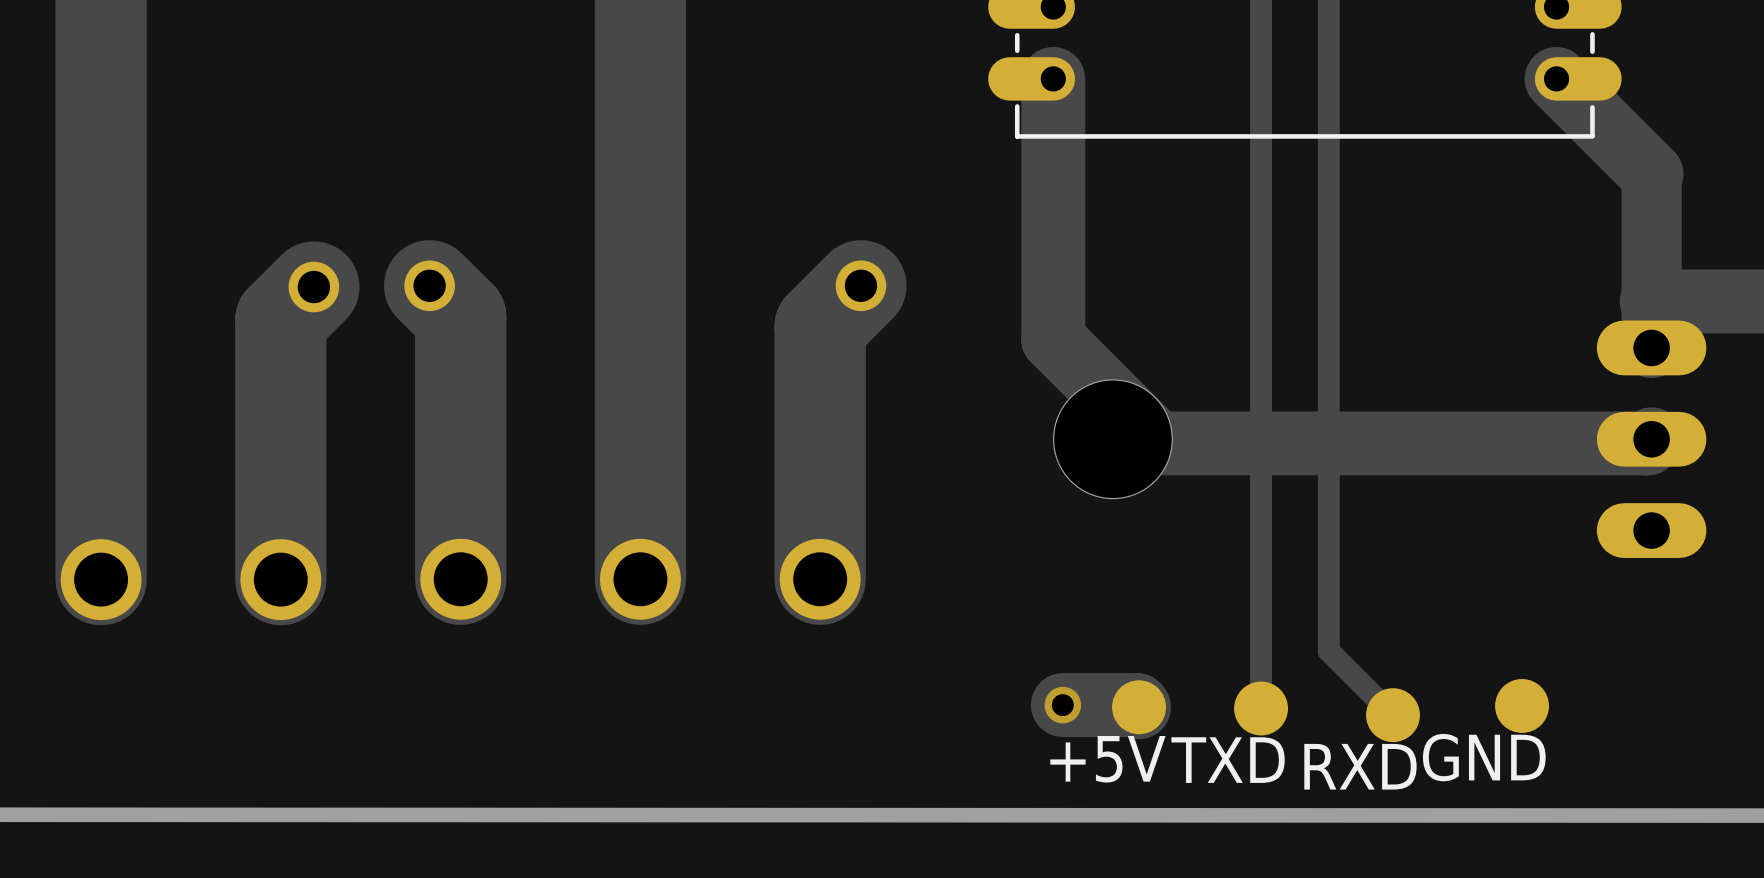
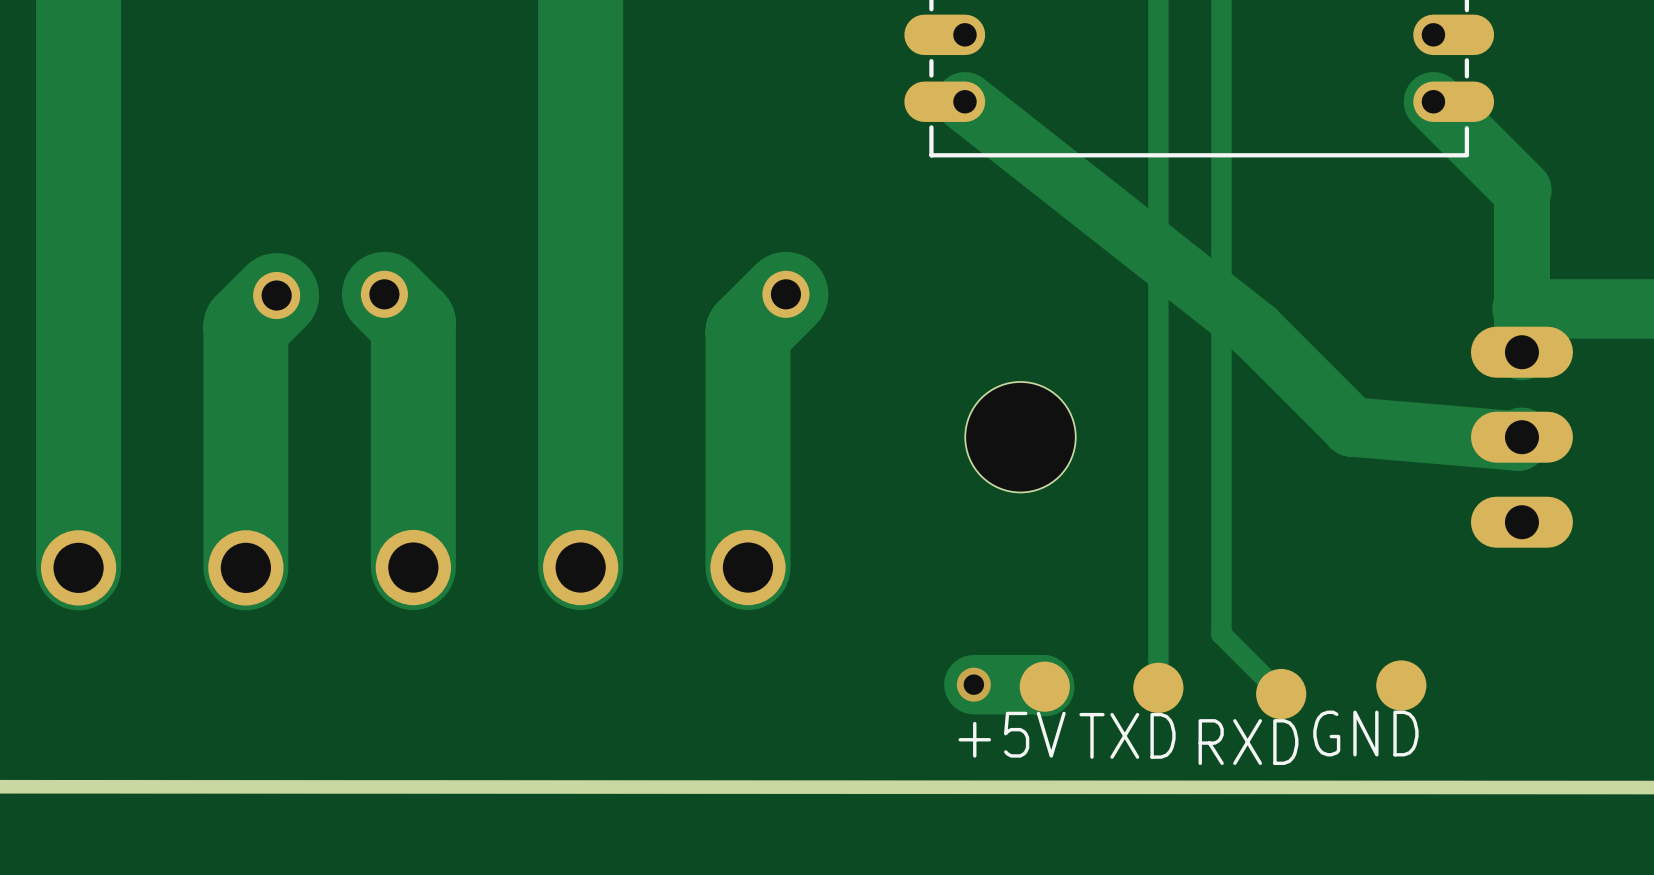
track: (1053, 78) (1053, 339) (1157, 443) (1647, 443) -> (964, 101) (1255, 330) (1351, 427) (1518, 441)

